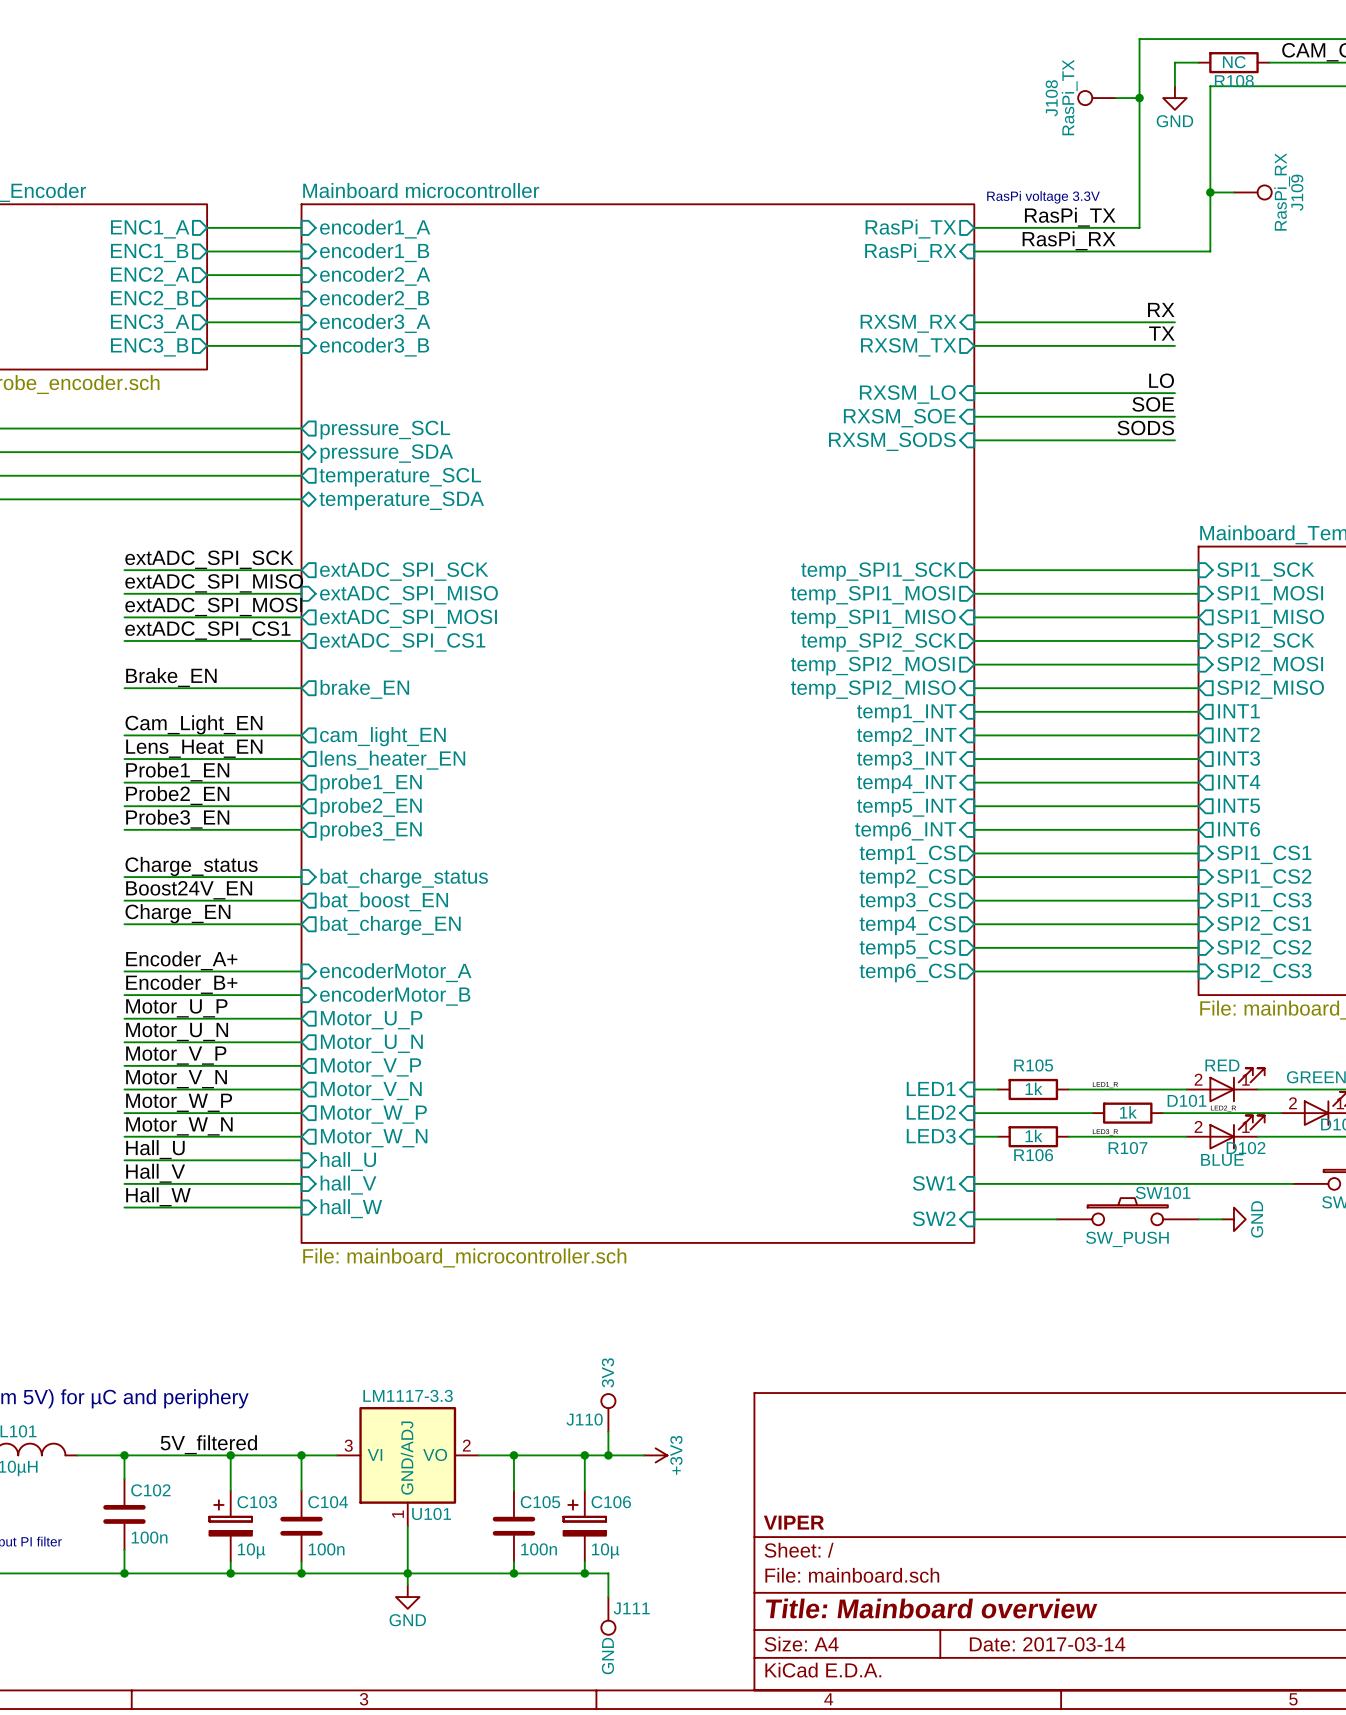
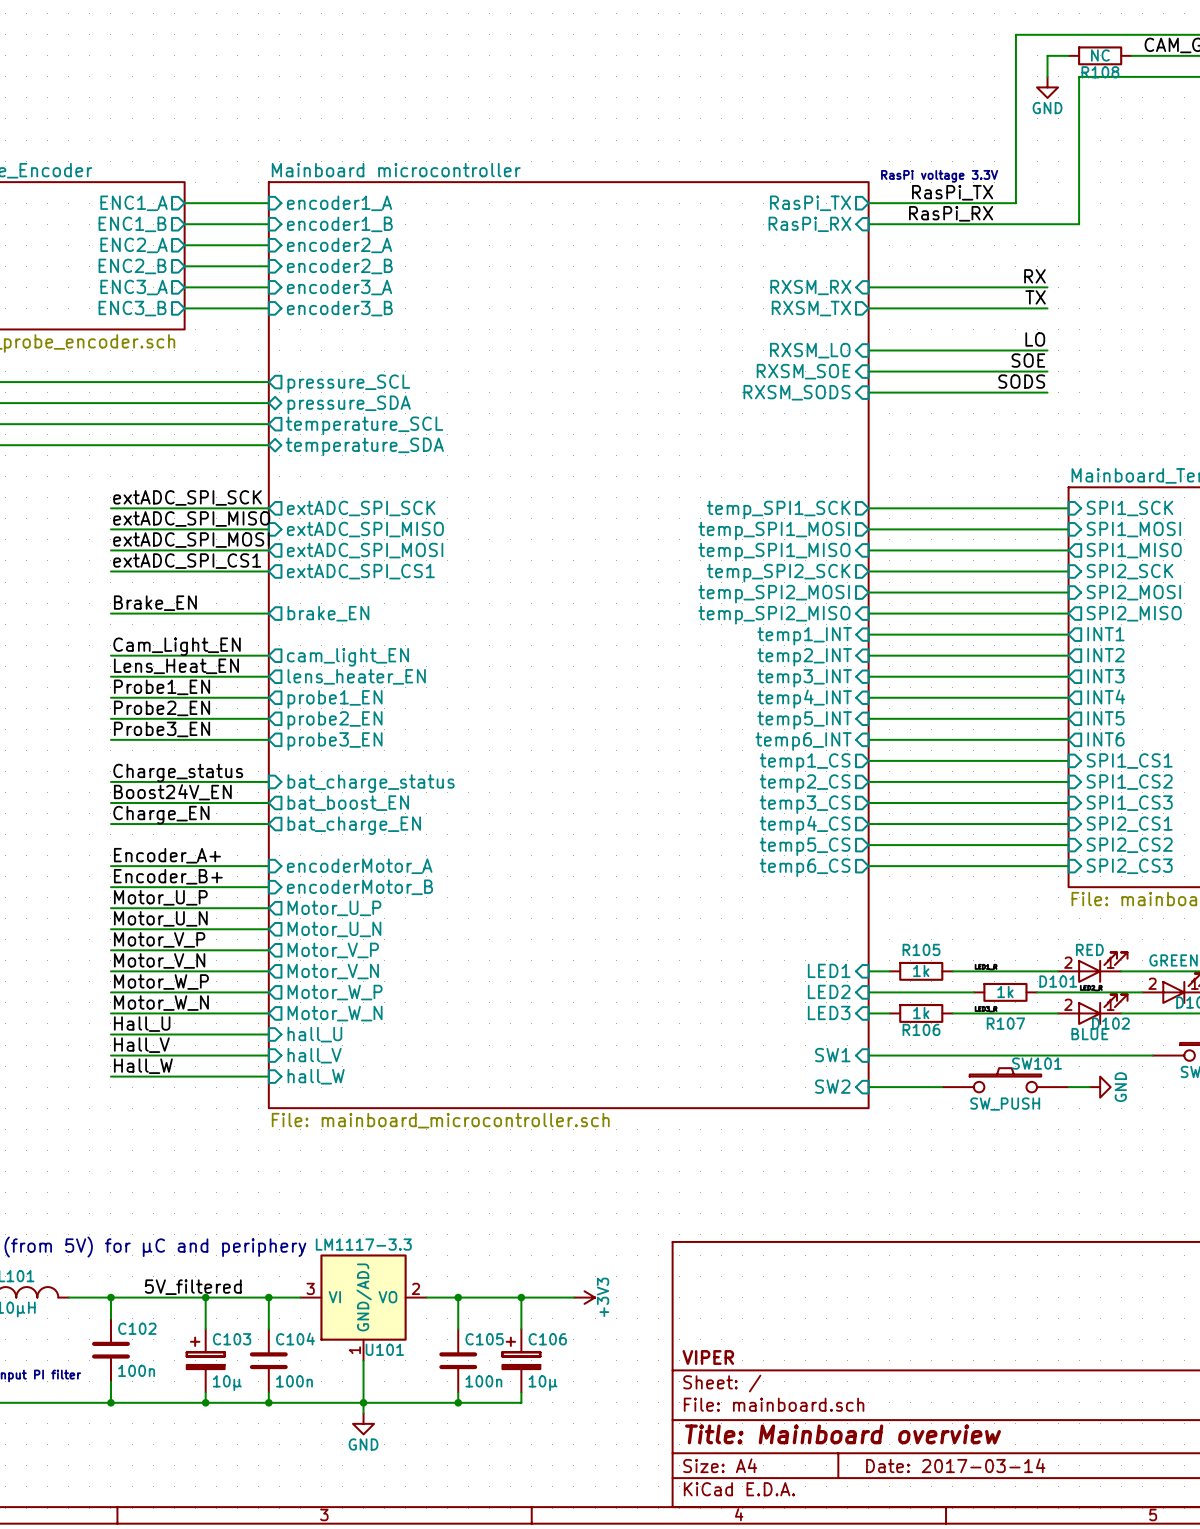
J108: RasPi_TX (1097, 98) -> none
wire: (1115, 98) (1139, 98) -> none
junction: (1139, 98) -> none
wire: (1210, 192) (1233, 192) -> none
junction: (1210, 192) -> none
J109: RasPi_RX (1252, 192) -> none
J110: 3V3 (608, 1412) -> none
wire: (608, 1431) (608, 1455) -> none
junction: (608, 1455) -> none
wire: (584, 1573) (608, 1573) (608, 1597) -> none
junction: (584, 1573) -> none
J111: GND (608, 1615) -> none

